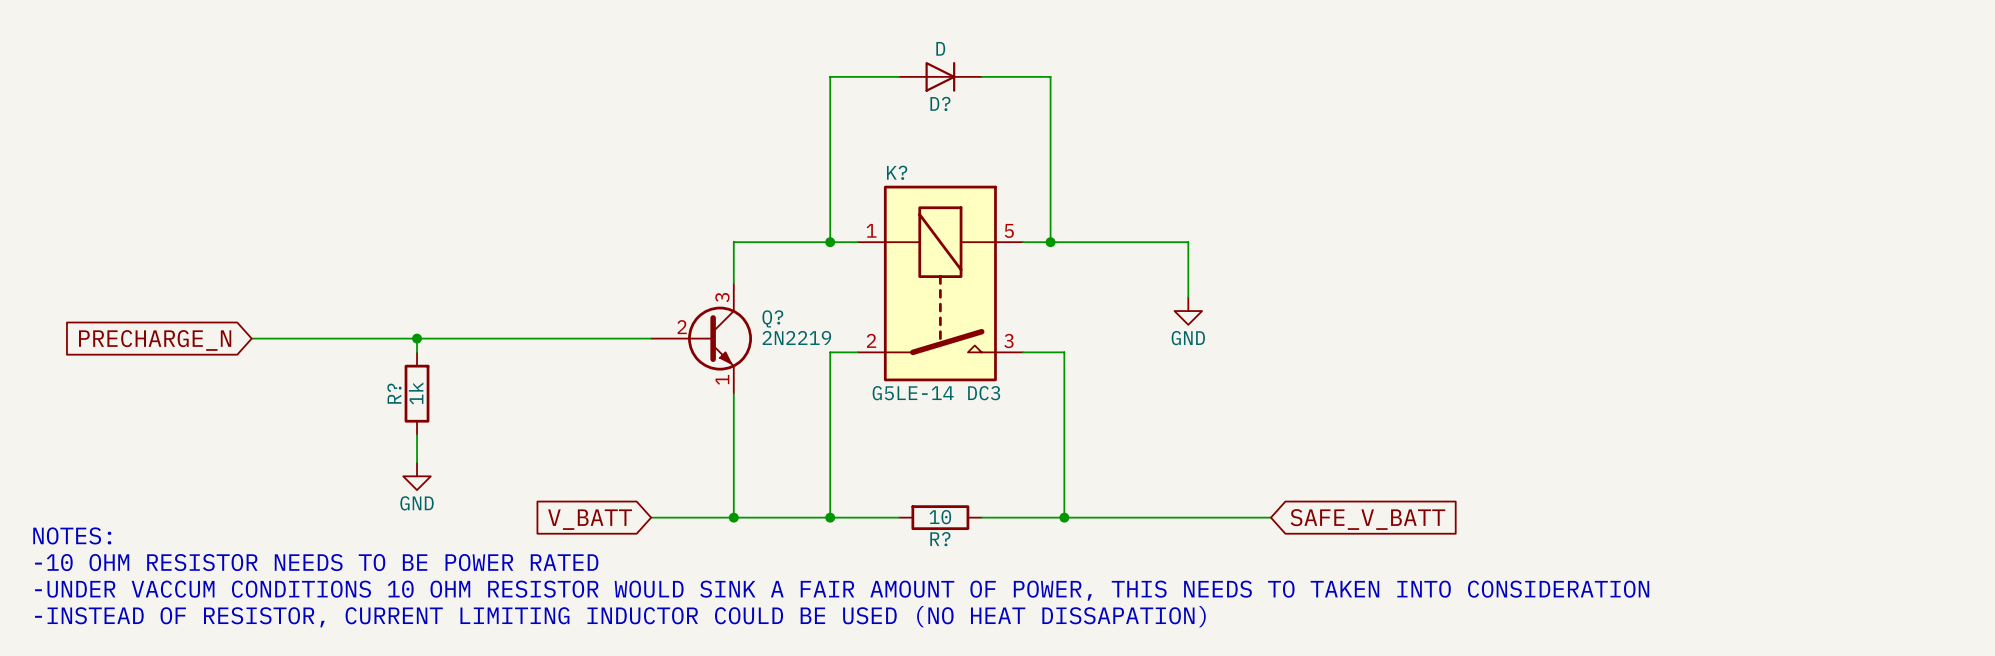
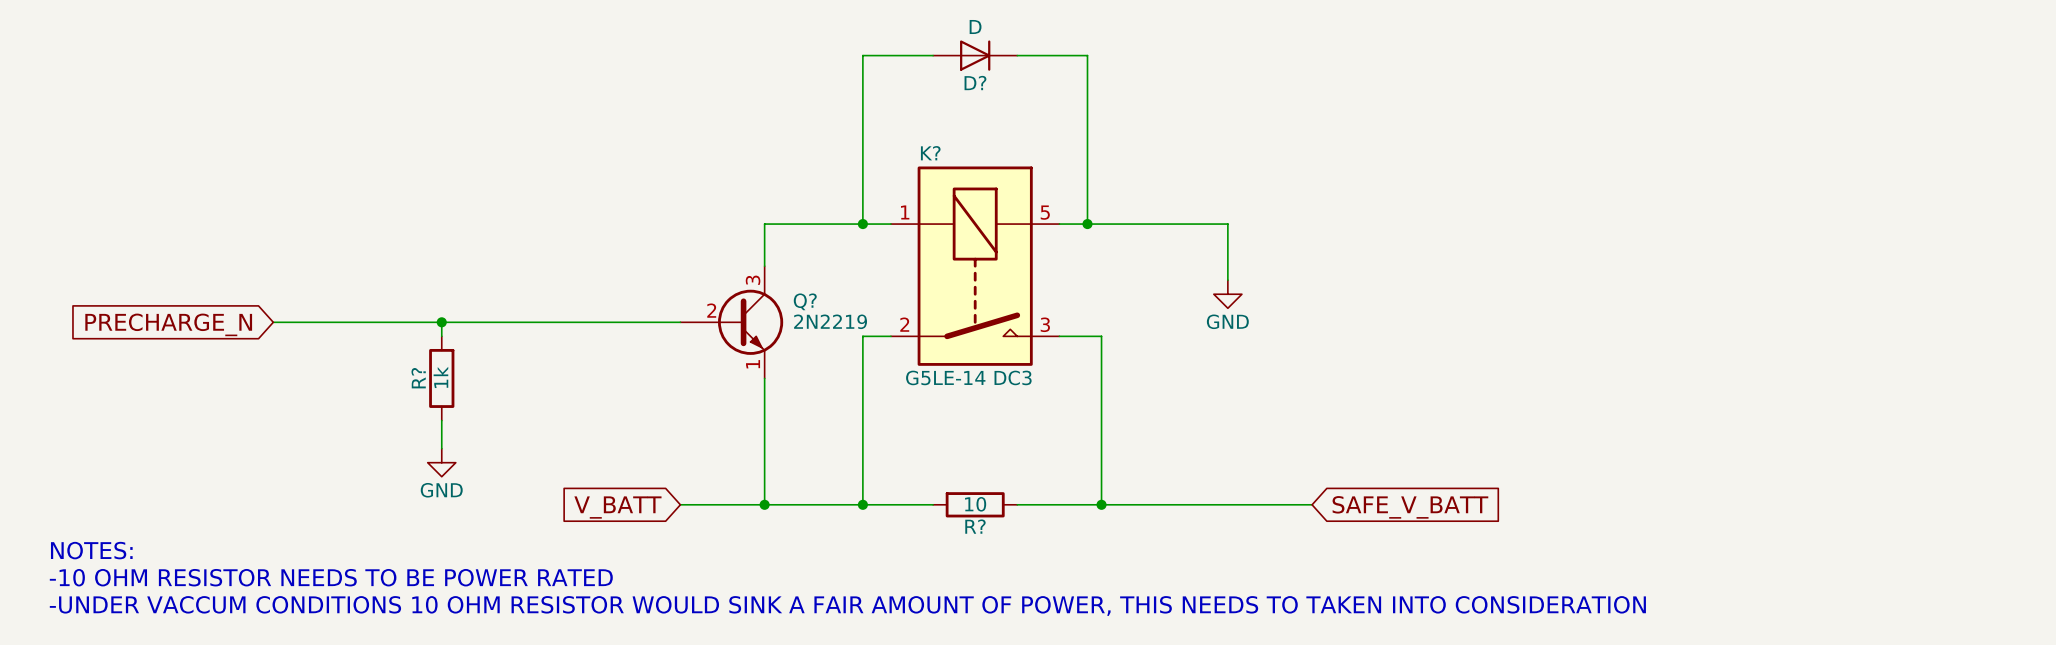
text: NOTES: (72, 535) -> none
text: -10 OHM RESISTOR NEEDS TO BE POWER RATED (316, 562) -> NOTES: (91, 550)
text: -UNDER VACCUM CONDITIONS 10 OHM RESISTOR WOULD SINK A FAIR AMOUNT OF POWER, THIS NEEDS TO TAKEN INTO CONSIDERATION (842, 590) -> -10 OHM RESISTOR NEEDS TO BE POWER RATED (331, 577)
text: -INSTEAD OF RESISTOR, CURRENT LIMITING INDUCTOR COULD BE USED (NO HEAT DISSAPATION) (620, 616) -> -UNDER VACCUM CONDITIONS 10 OHM RESISTOR WOULD SINK A FAIR AMOUNT OF POWER, THIS NEEDS TO TAKEN INTO CONSIDERATION (847, 606)

